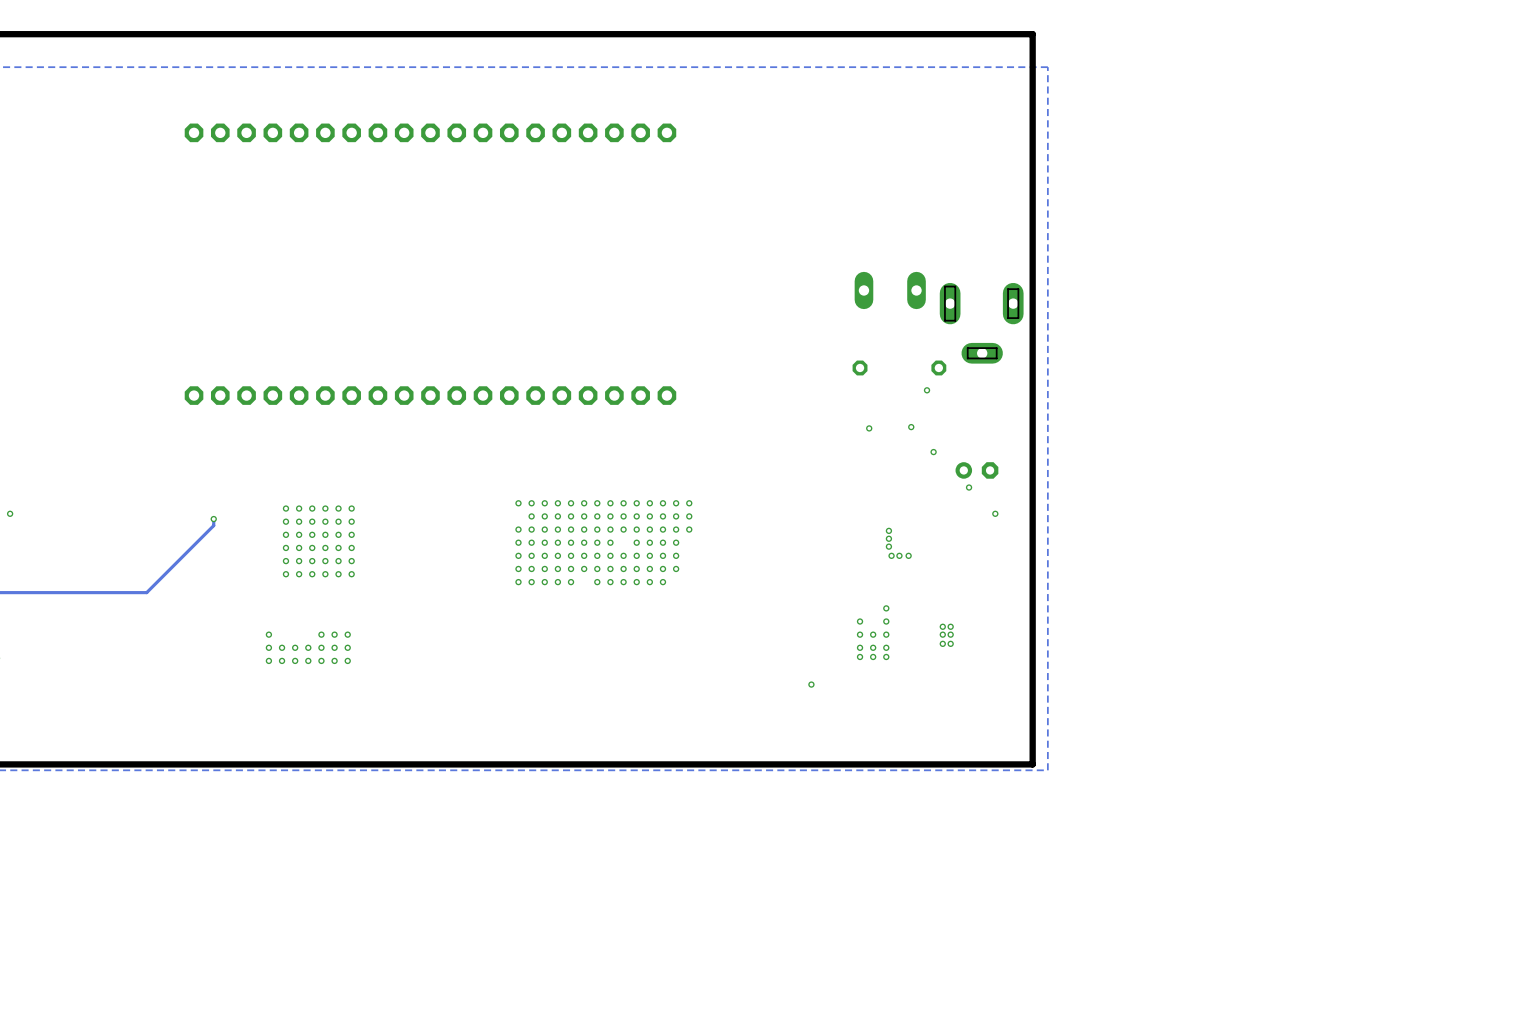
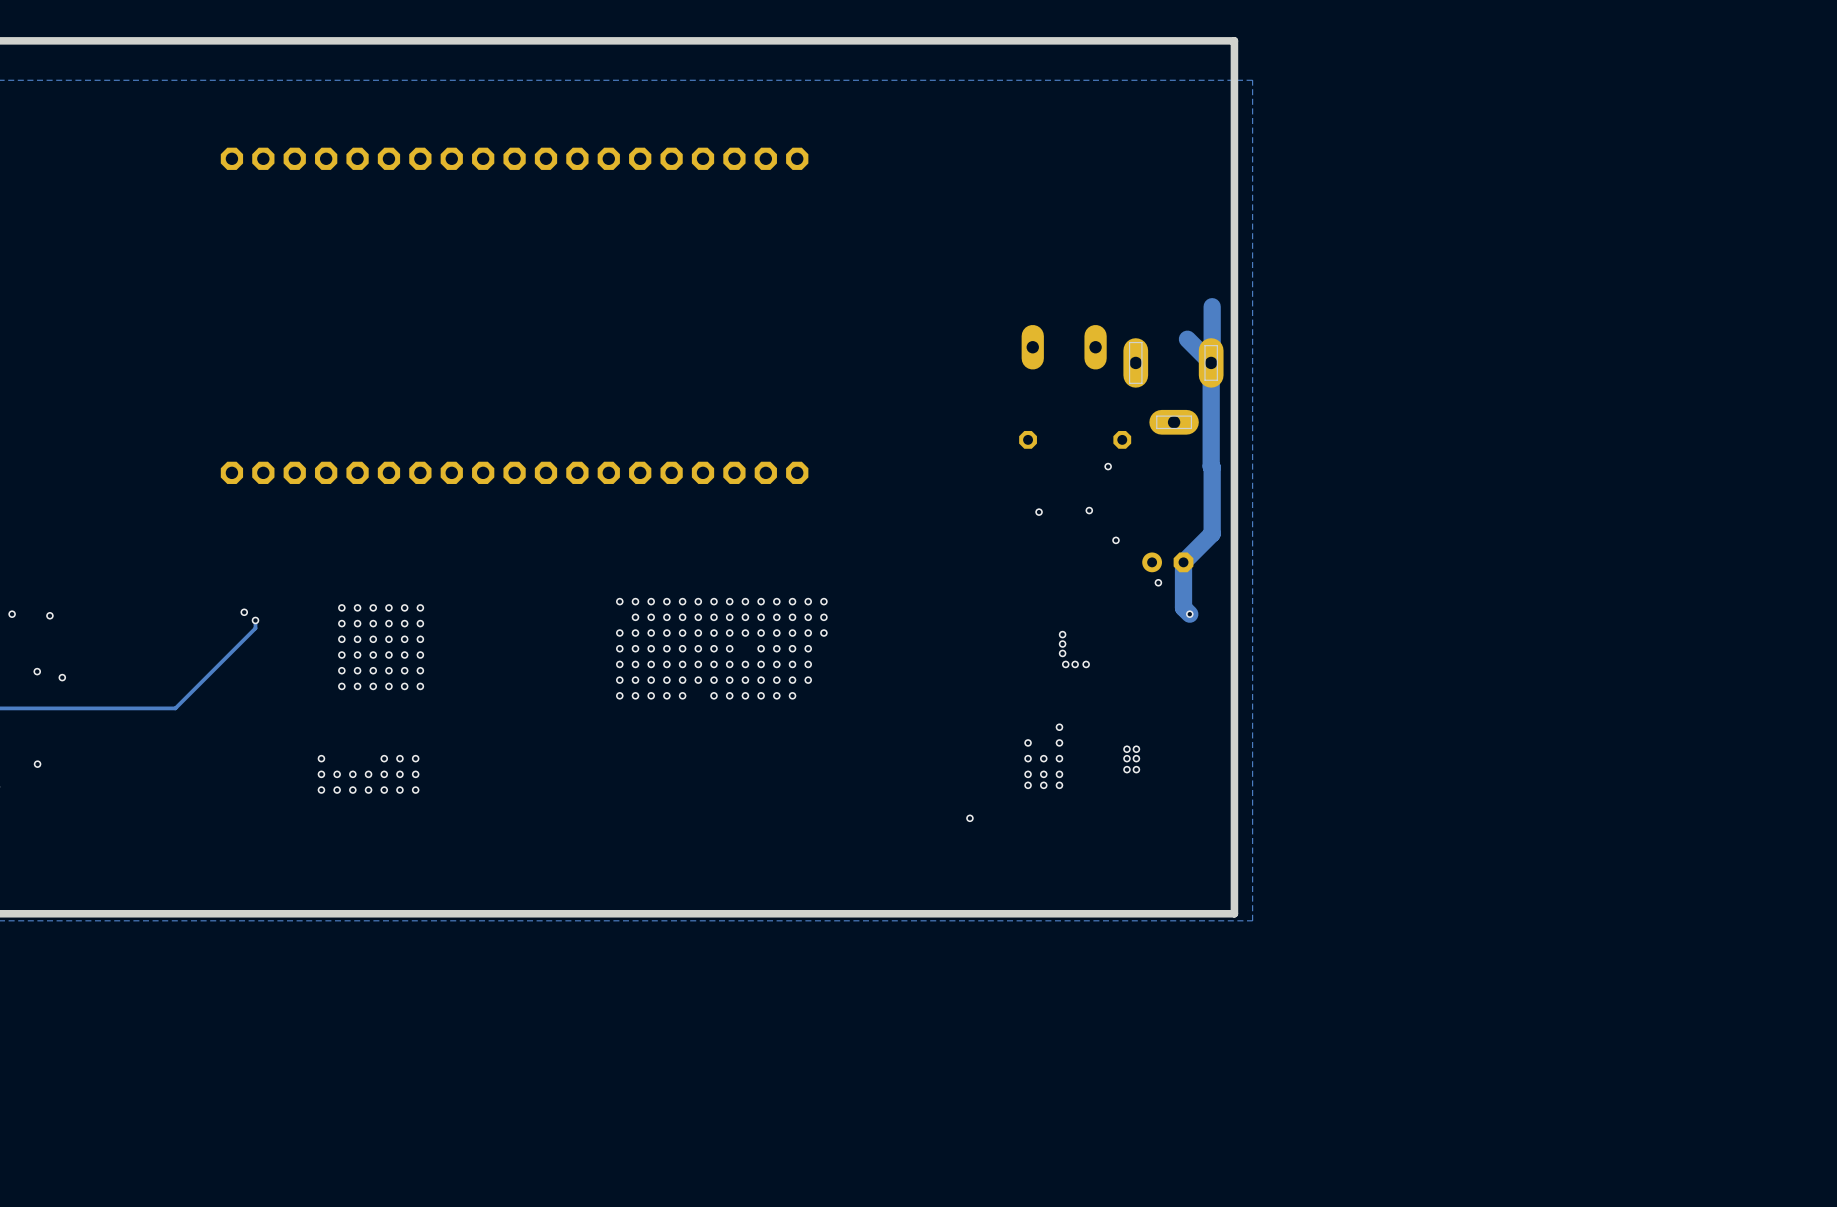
track: none -> (1212, 306) (1211, 362)
track: none -> (1187, 339) (1211, 362)
track: none -> (1211, 362) (1212, 533) (1183, 562) (1183, 607) (1189, 614)
via: none -> (244, 612)
via: none -> (49, 615)
via: none -> (37, 671)
via: none -> (62, 677)
via: none -> (37, 764)

